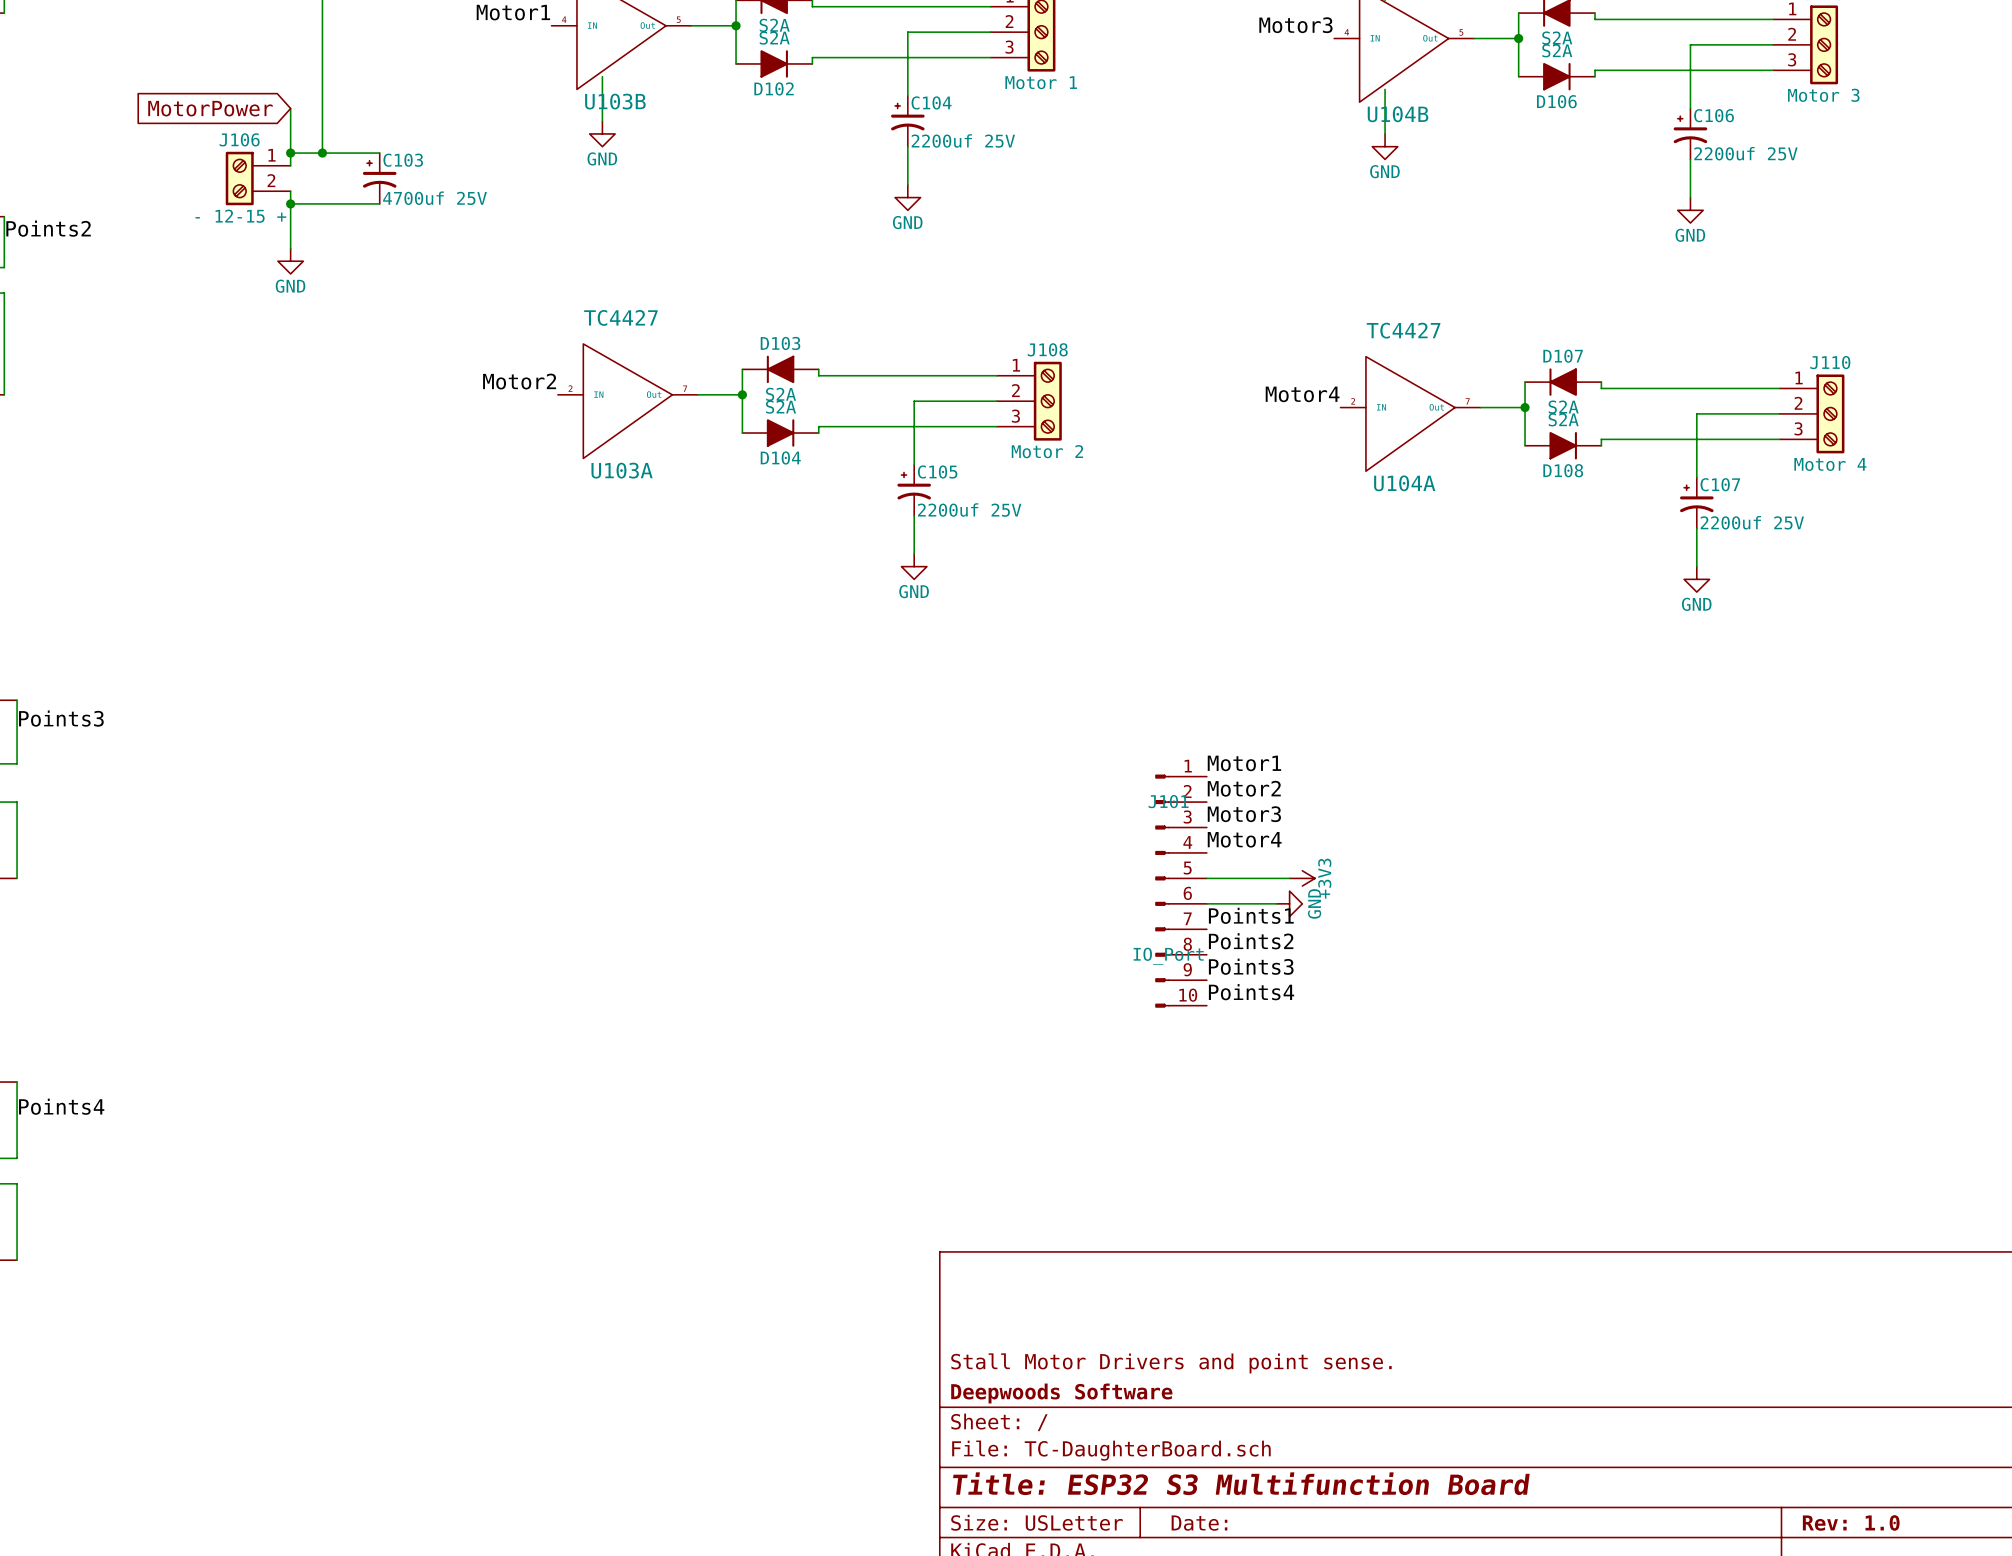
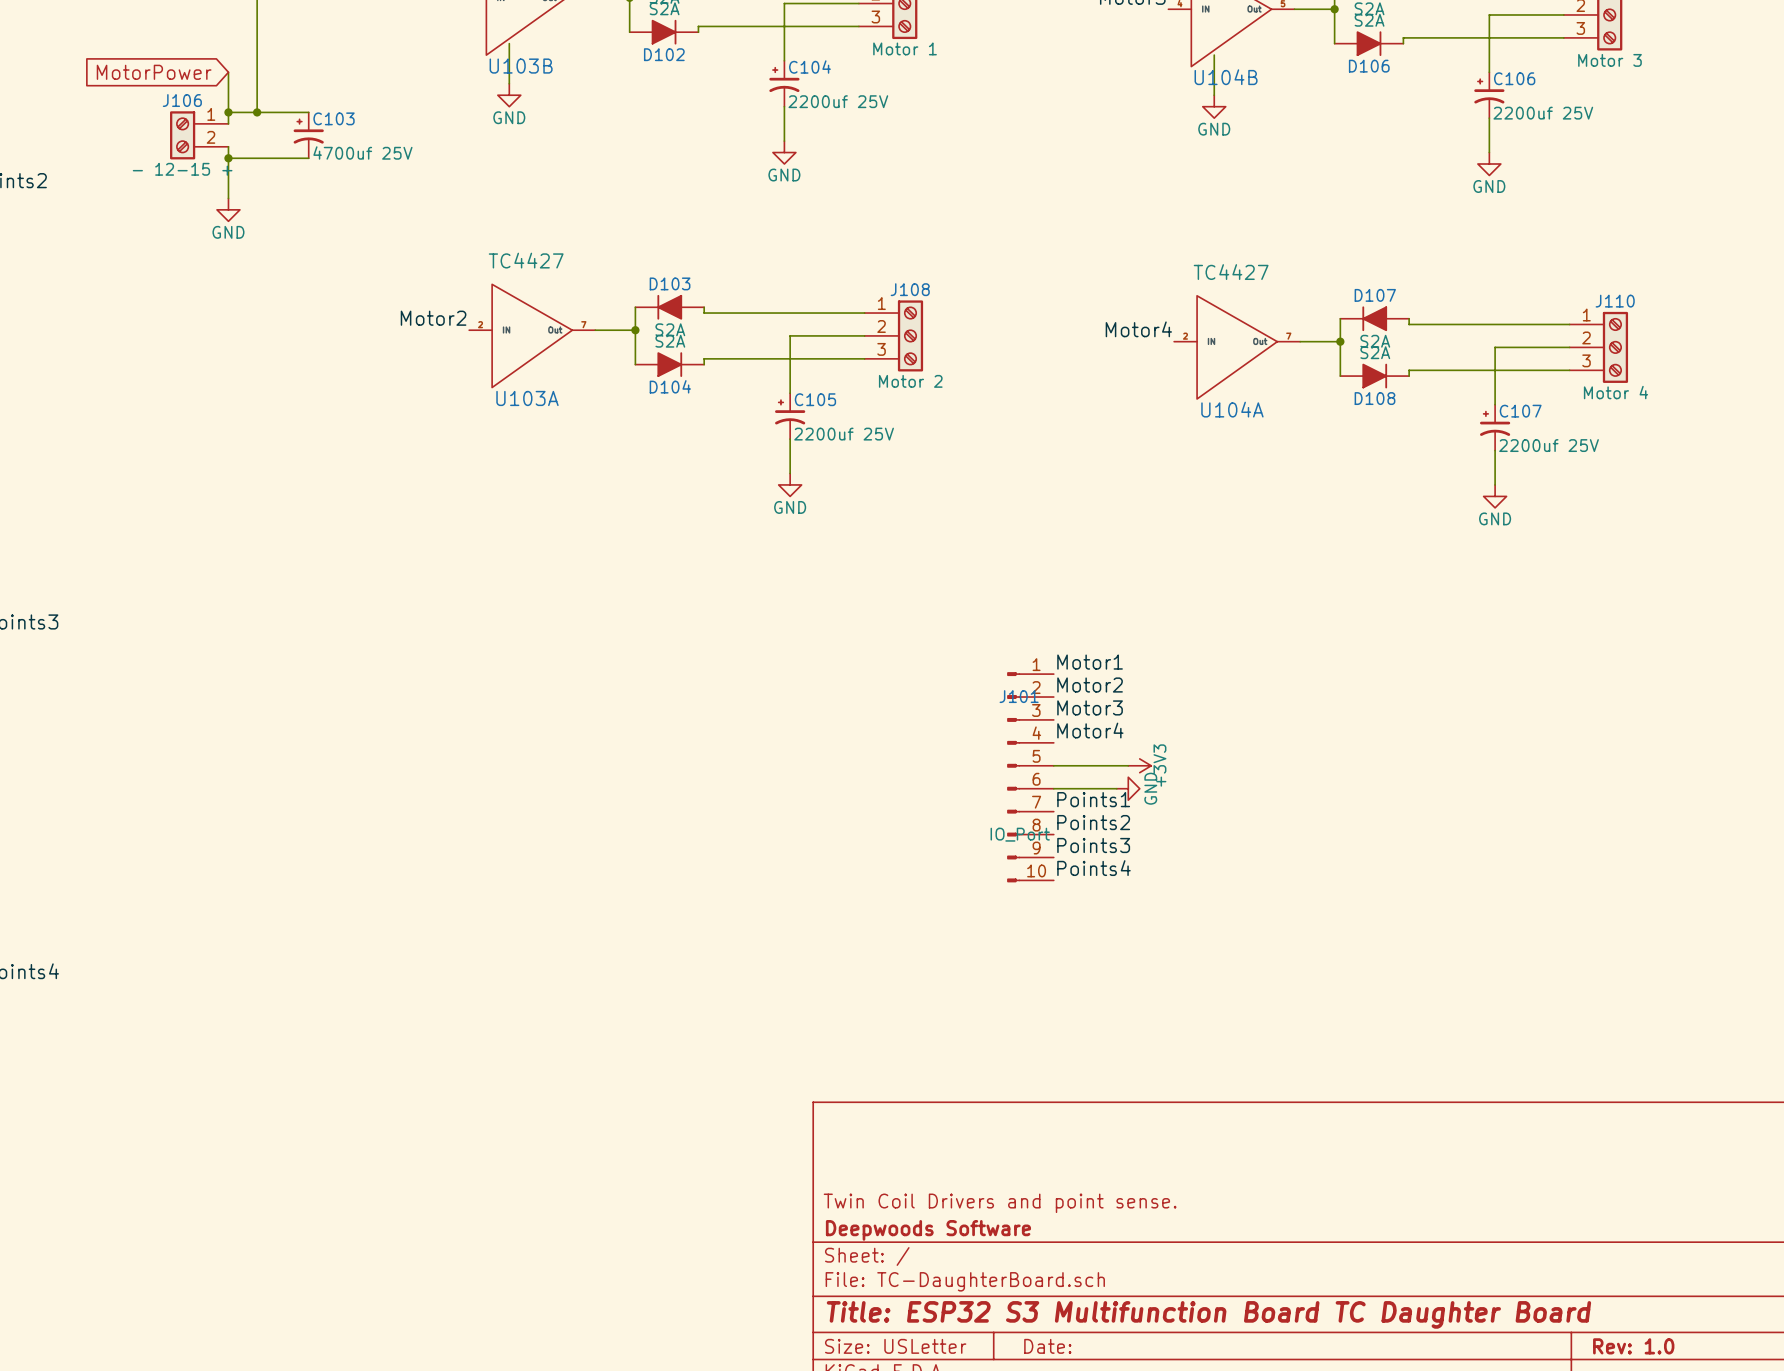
title block: Stall Motor Drivers and point sense. (1171, 1363) -> Twin Coil Drivers and point sense. (1000, 1203)
title block: Title: ESP32 S3 Multifunction Board (1241, 1483) -> Title: ESP32 S3 Multifunction Board TC Daughter Board (1208, 1314)

